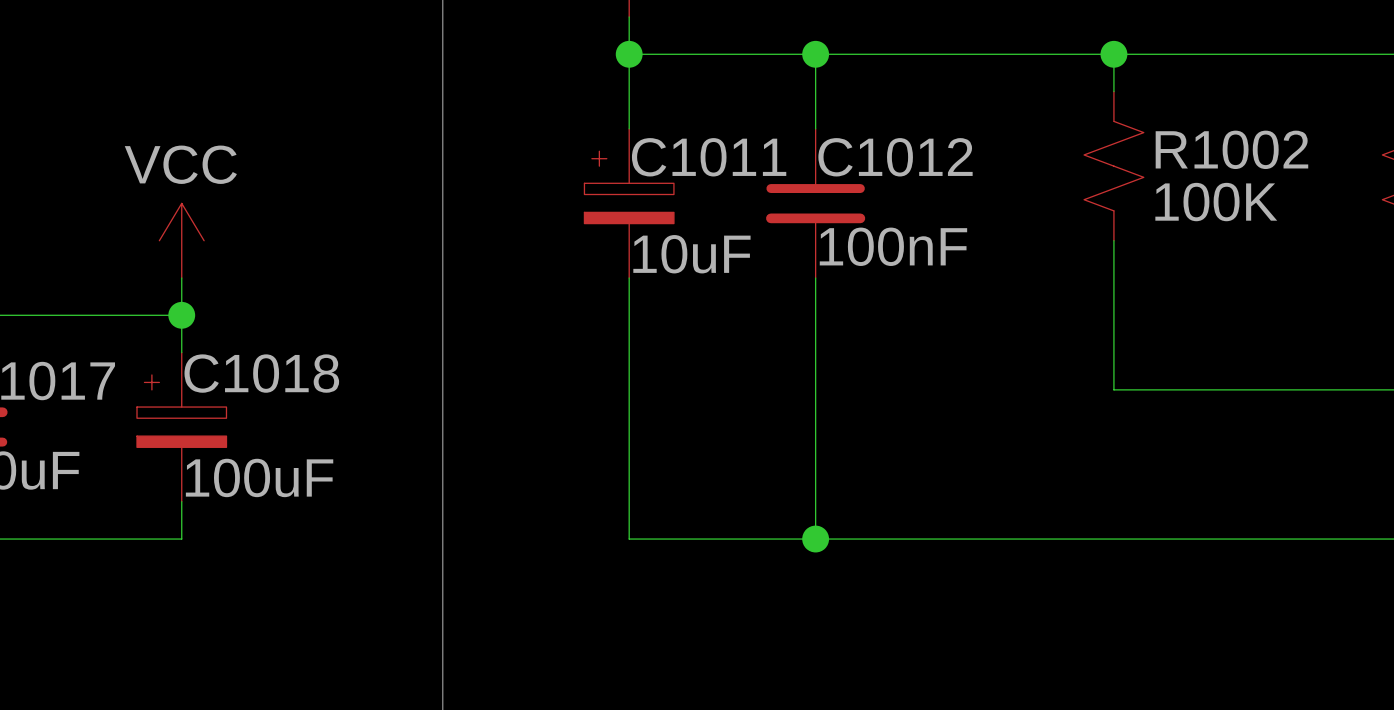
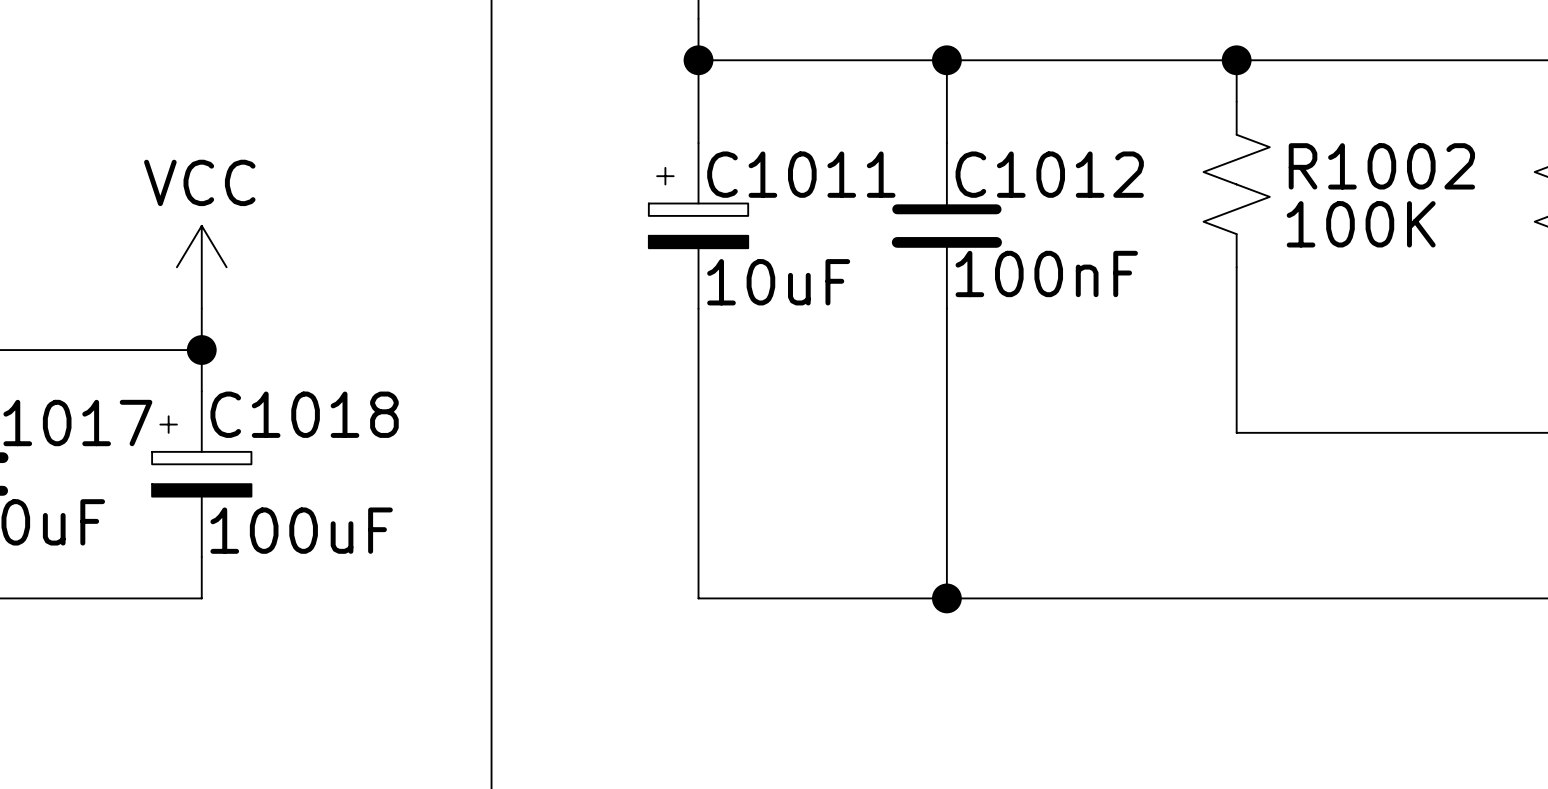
wire: (815, 54) (815, 128) -> (946, 60) (946, 143)
junction position: (815, 54) -> (946, 60)
C1012 position: (815, 203) -> (946, 225)
wire: (815, 278) (815, 539) -> (946, 308) (946, 598)
junction position: (815, 539) -> (946, 598)

